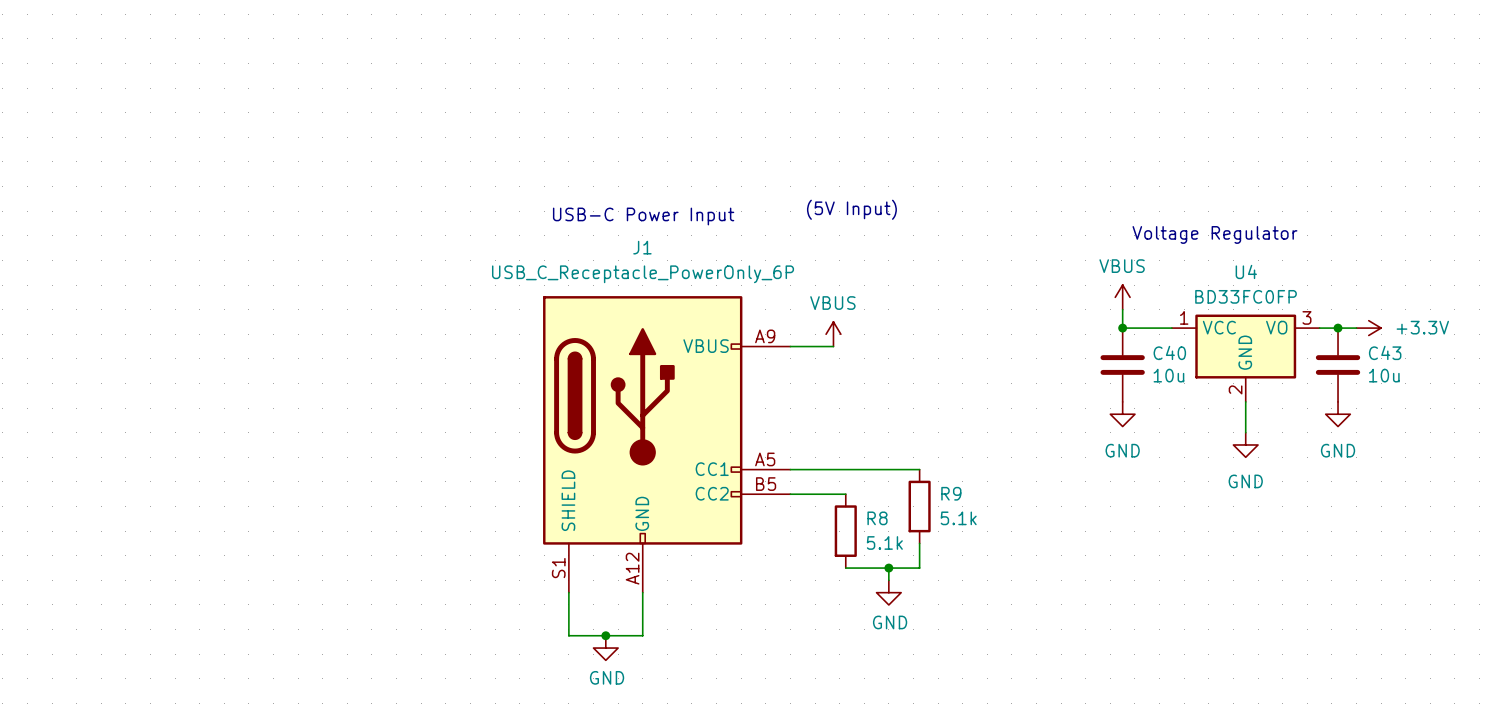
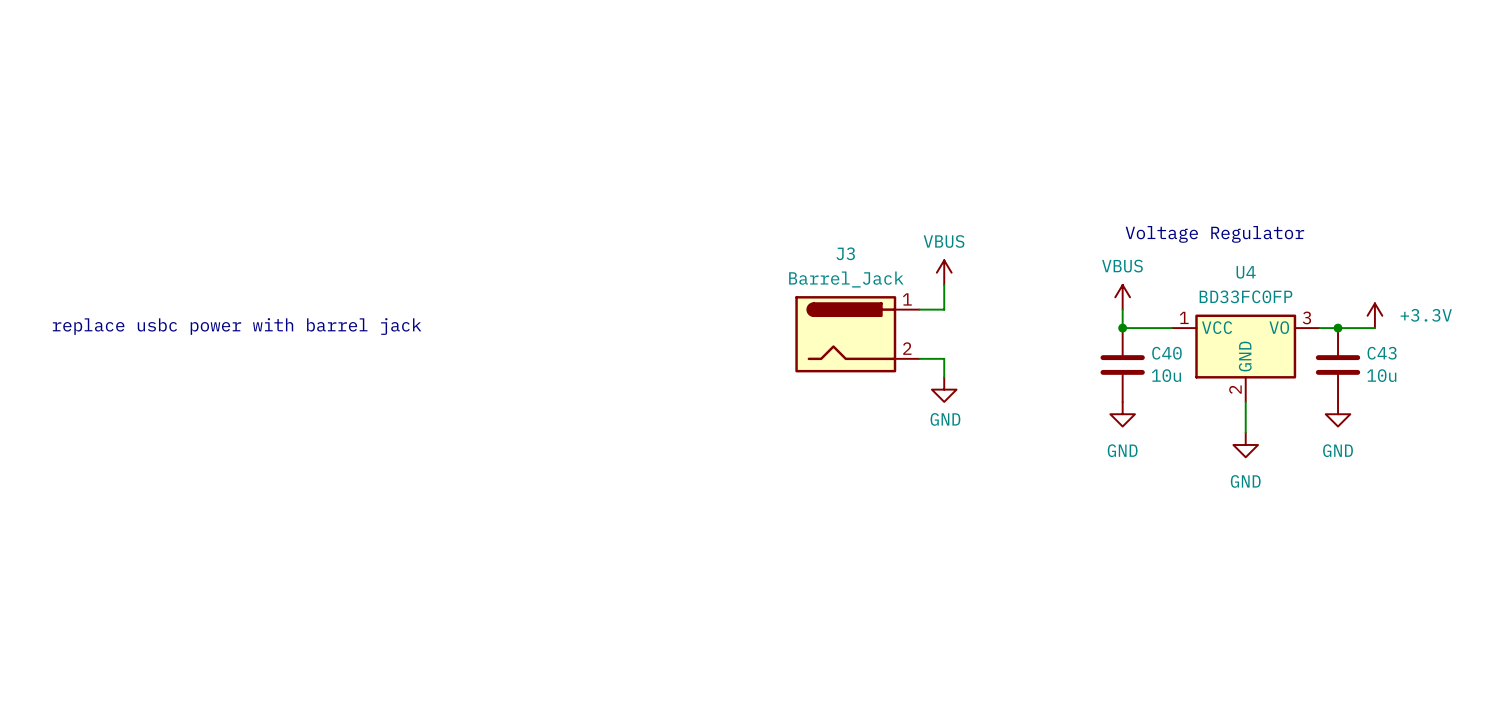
text: (5V Input) (851, 209) -> none
text: USB-C Power Input (643, 216) -> none
wire: none -> (944, 285) (944, 309) (919, 309)
text: none -> replace usbc power with barrel jack (237, 326)
power symbol rotation: 0° (1368, 328) -> 90° counterclockwise (1374, 315)
power symbol position: VBUS (833, 334) -> VBUS (944, 272)
J3: none -> Barrel_Jack (857, 334)
wire: none -> (919, 358) (944, 358) (944, 377)
J1: USB_C_Receptacle_PowerOnly_6P (666, 444) -> none
wire: (790, 469) (919, 469) -> none
wire: (790, 494) (845, 494) -> none
R9: 5.1k (919, 506) -> none
R8: 5.1k (845, 531) -> none
wire: (919, 543) (919, 568) (845, 568) -> none
wire: (888, 568) (888, 580) -> none
junction: (888, 568) -> none
wire: (568, 592) (568, 635) (642, 635) (642, 592) -> none
power symbol position: GND (888, 592) -> GND (944, 389)
junction: (605, 635) -> none
power symbol: GND (605, 648) -> none

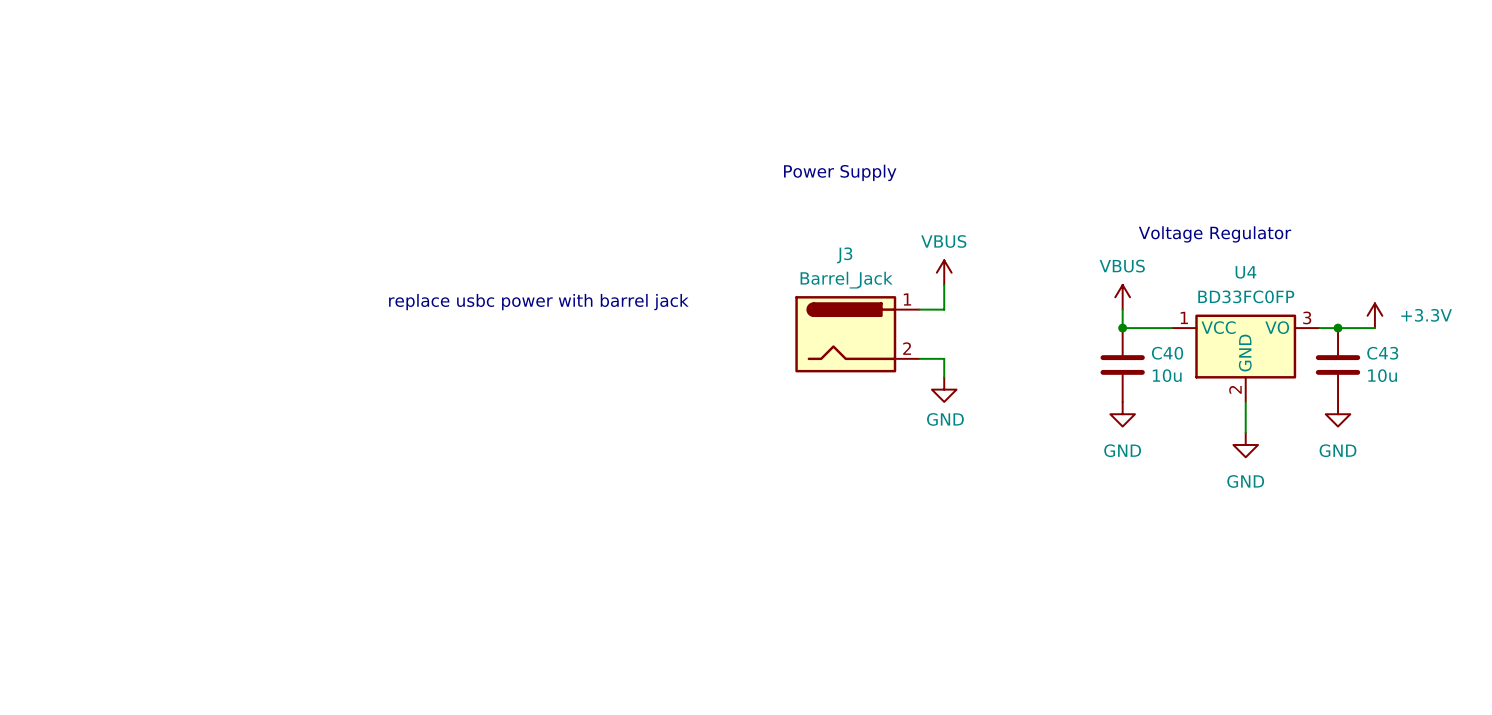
text: none -> Power Supply (840, 172)
text: none -> replace usbc power with barrel jack (538, 302)
text: replace usbc power with barrel jack (237, 326) -> none

